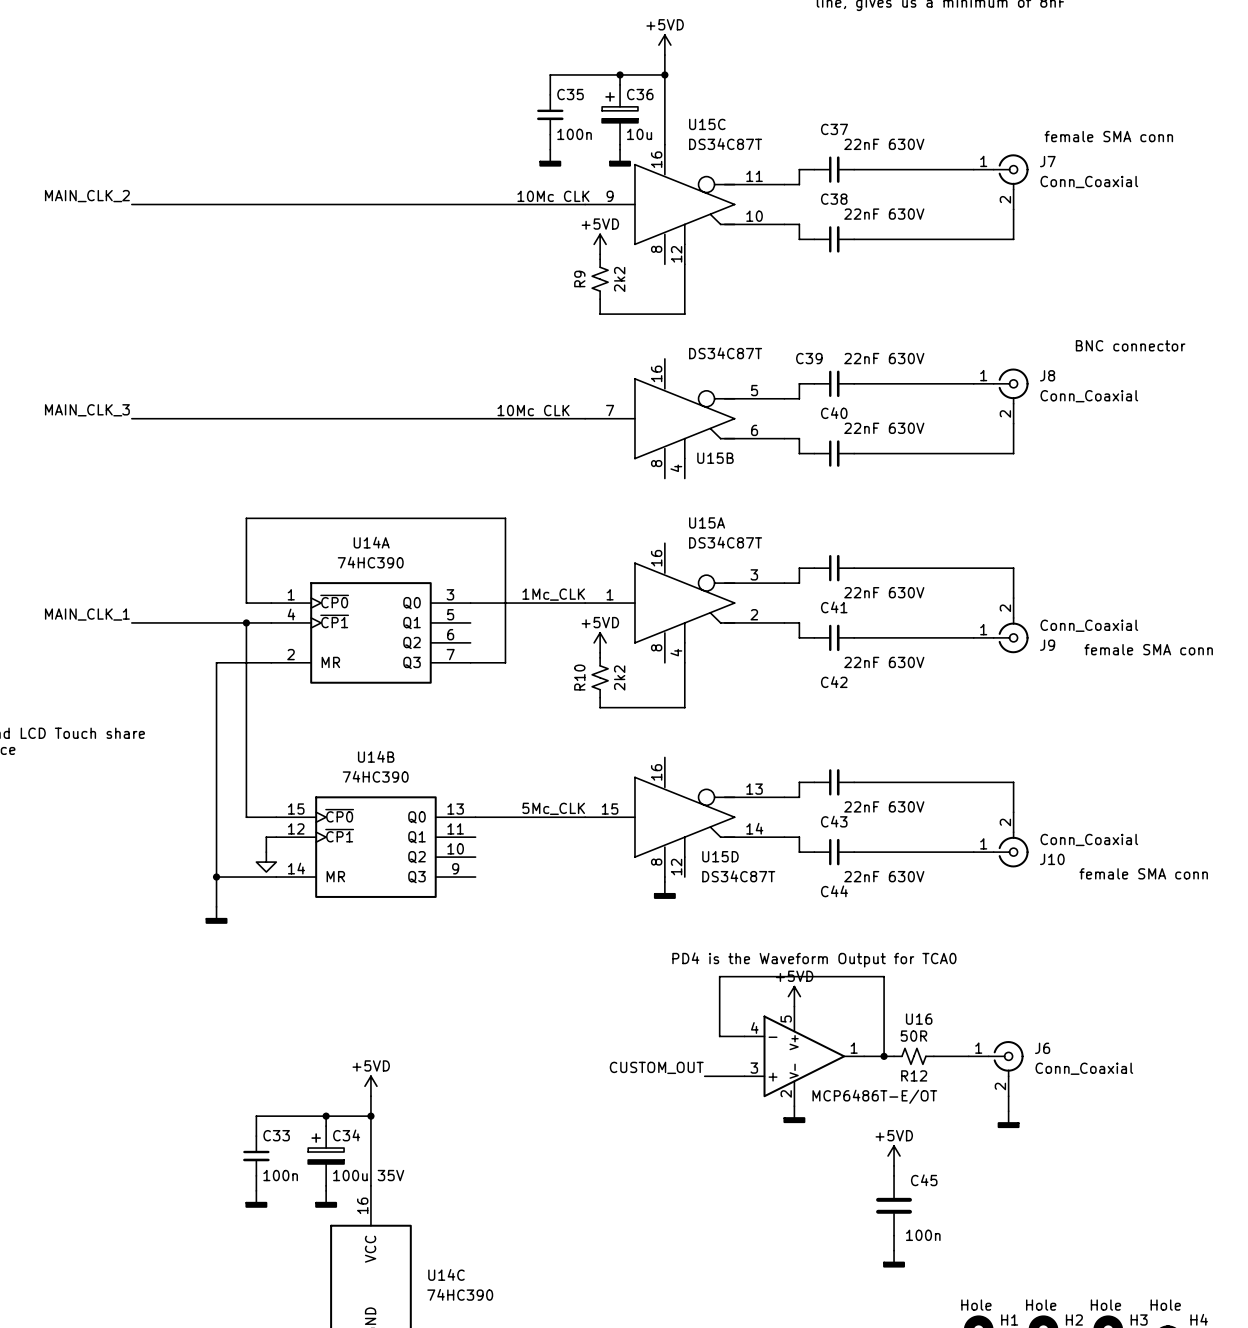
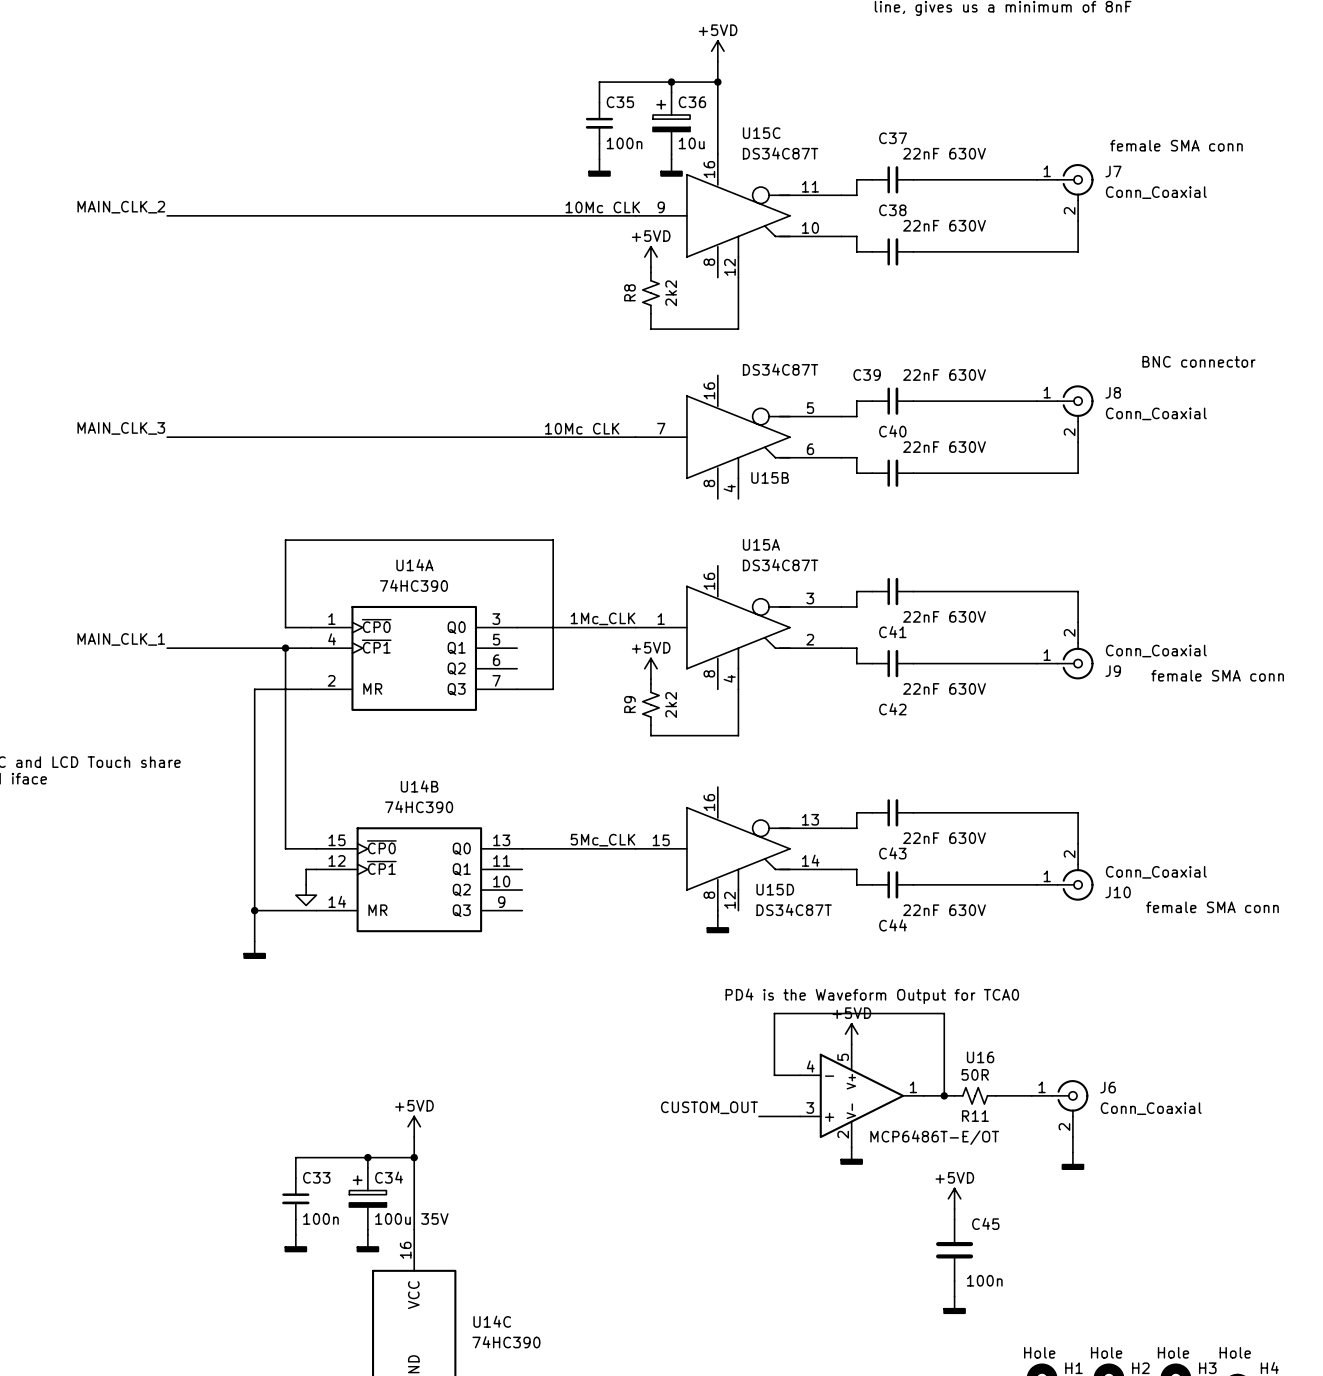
R9 name: R9 (579, 278) -> R8 (629, 292)
R10 name: R10 (579, 677) -> R9 (629, 704)
R12 name: R12 (914, 1075) -> R11 (975, 1116)

